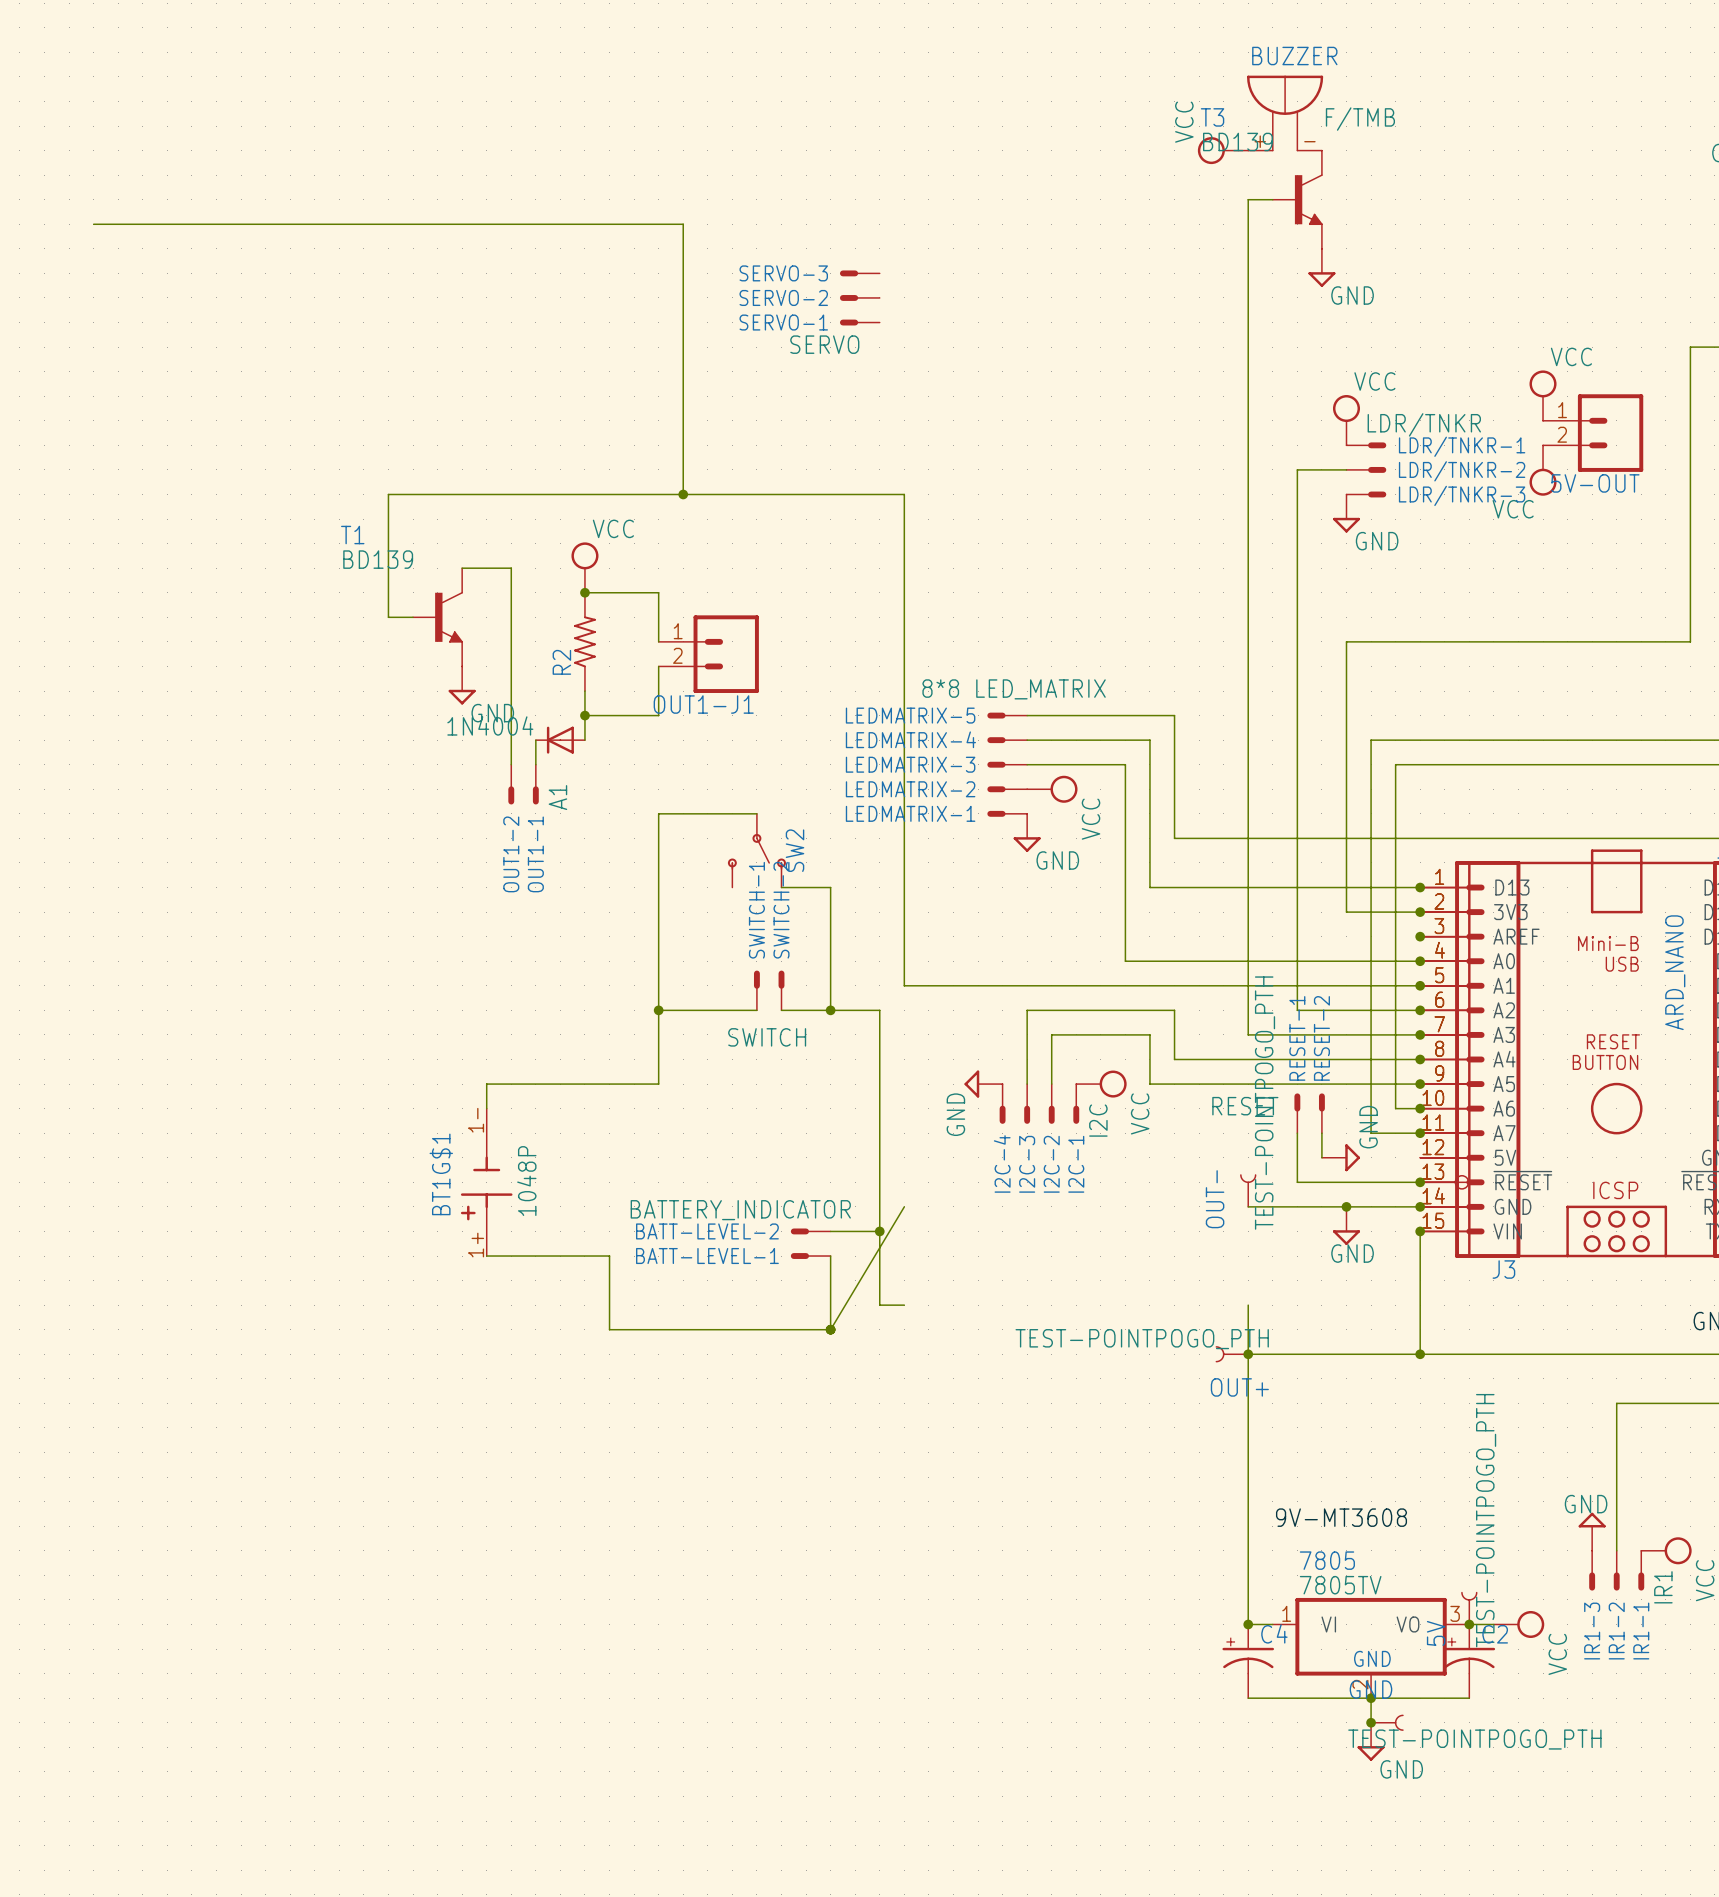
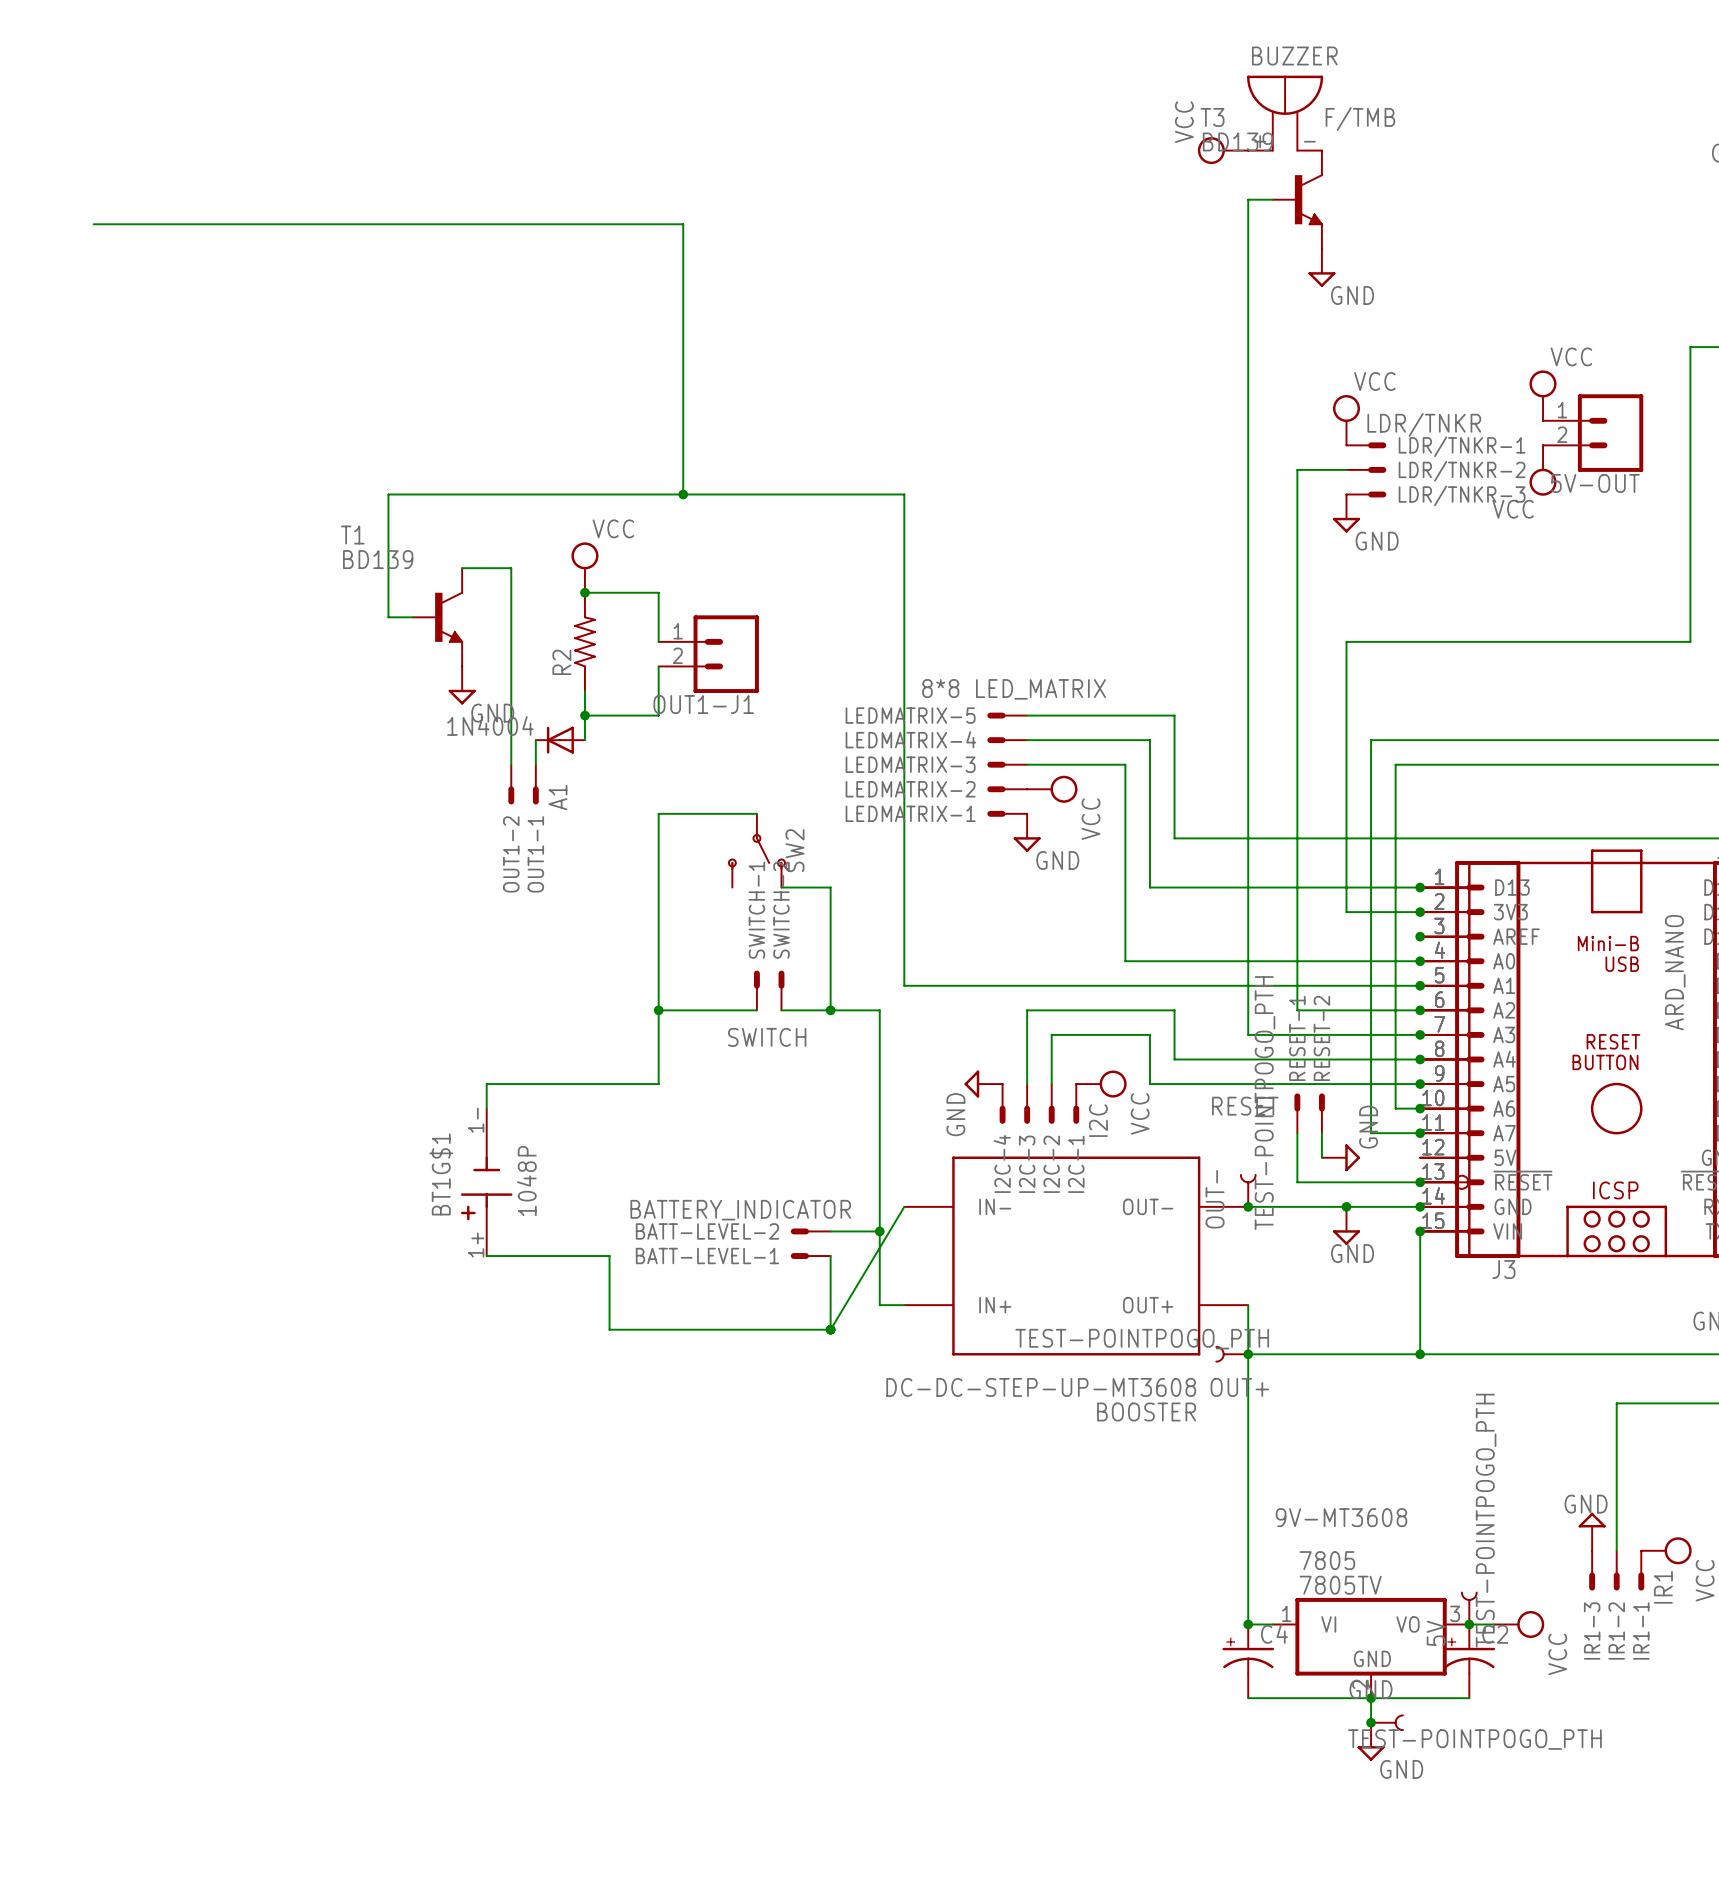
SERVO-3: (859, 273) -> none
SERVO-2: (859, 297) -> none
SERVO-1: SERVO (859, 322) -> none
junction: none -> (1248, 1206)
BOOSTER: none -> DC-DC-STEP-UP-MT3608 (1076, 1256)

